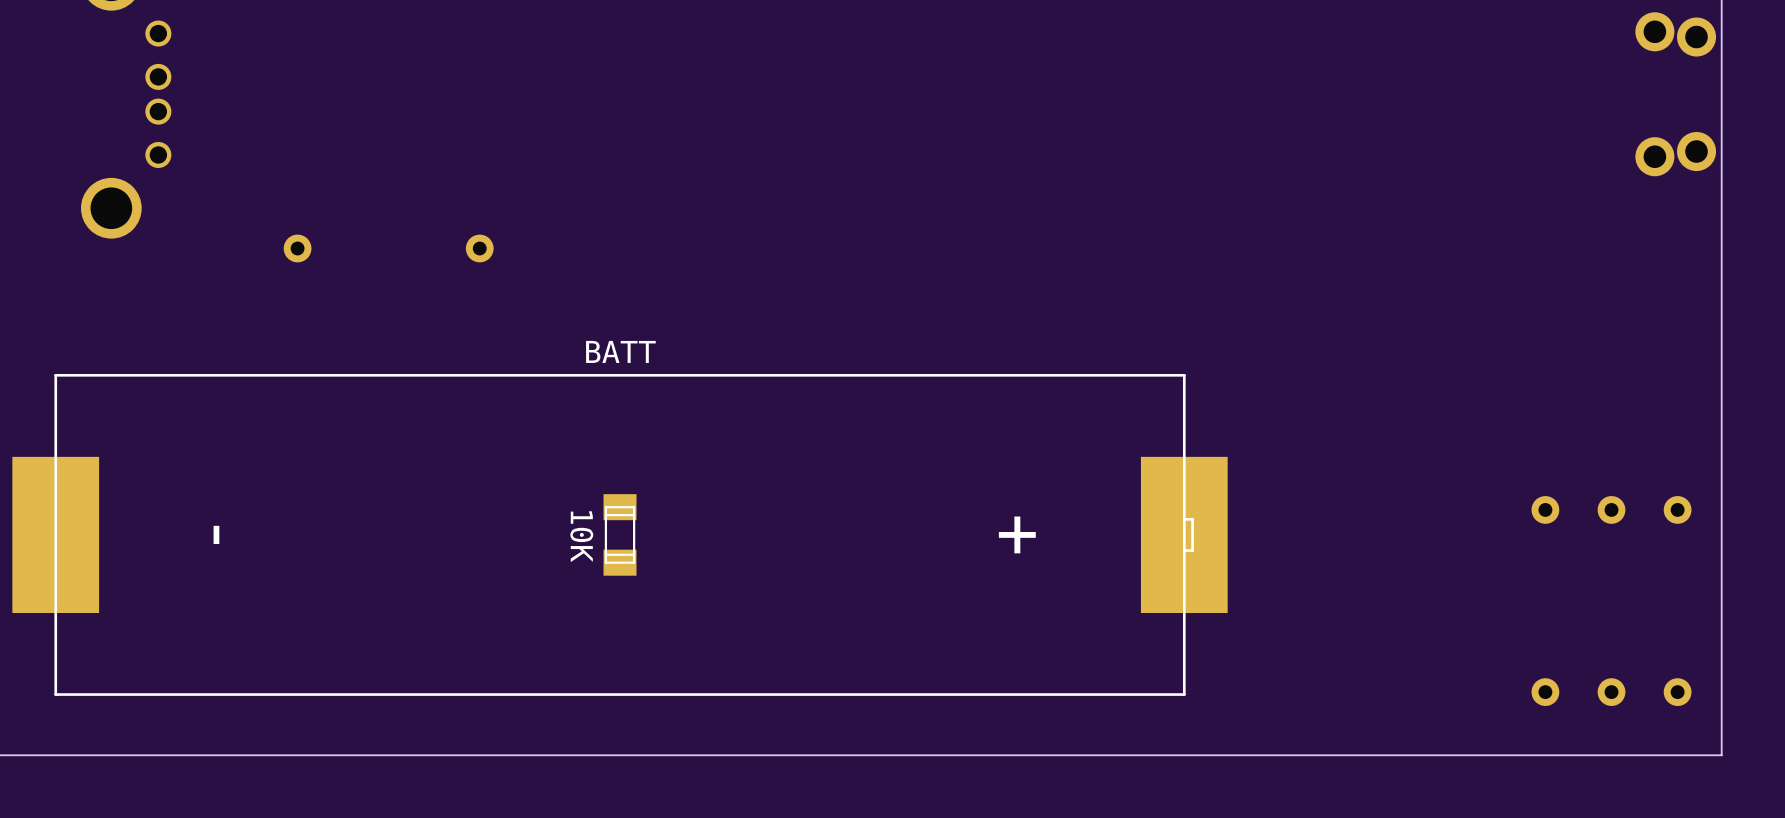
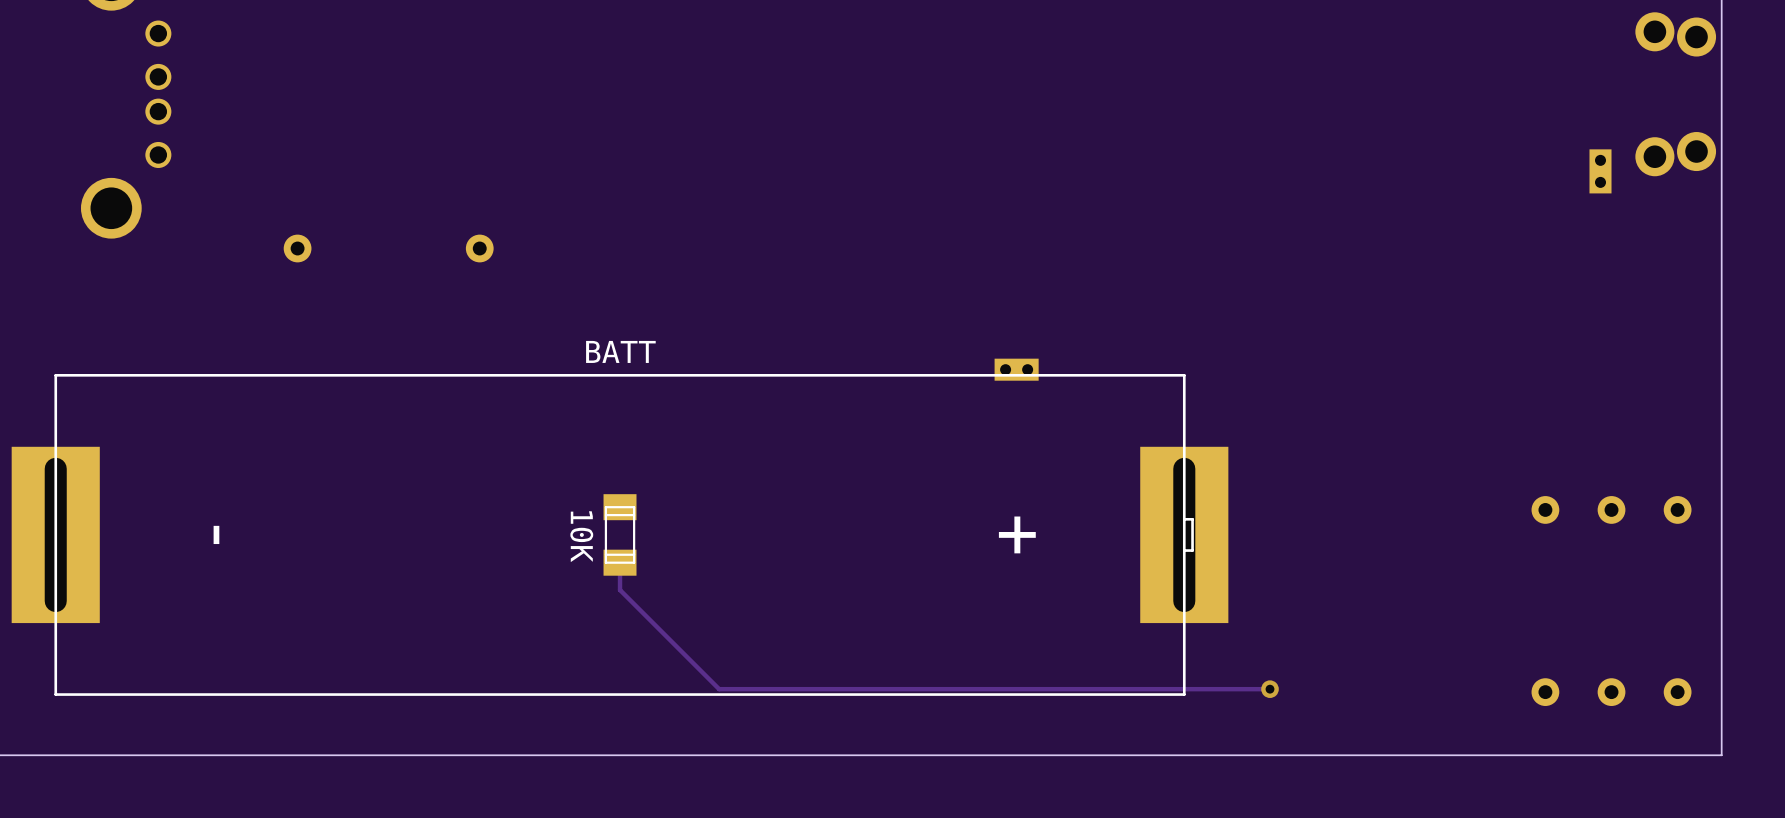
part: none -> (1600, 171)
part: none -> (1016, 369)
part footprint: [12, 374, 1228, 696] -> [11, 374, 1229, 696]
track: none -> (620, 562) (620, 590) (719, 689) (1270, 689)
via: none -> (1270, 689)

